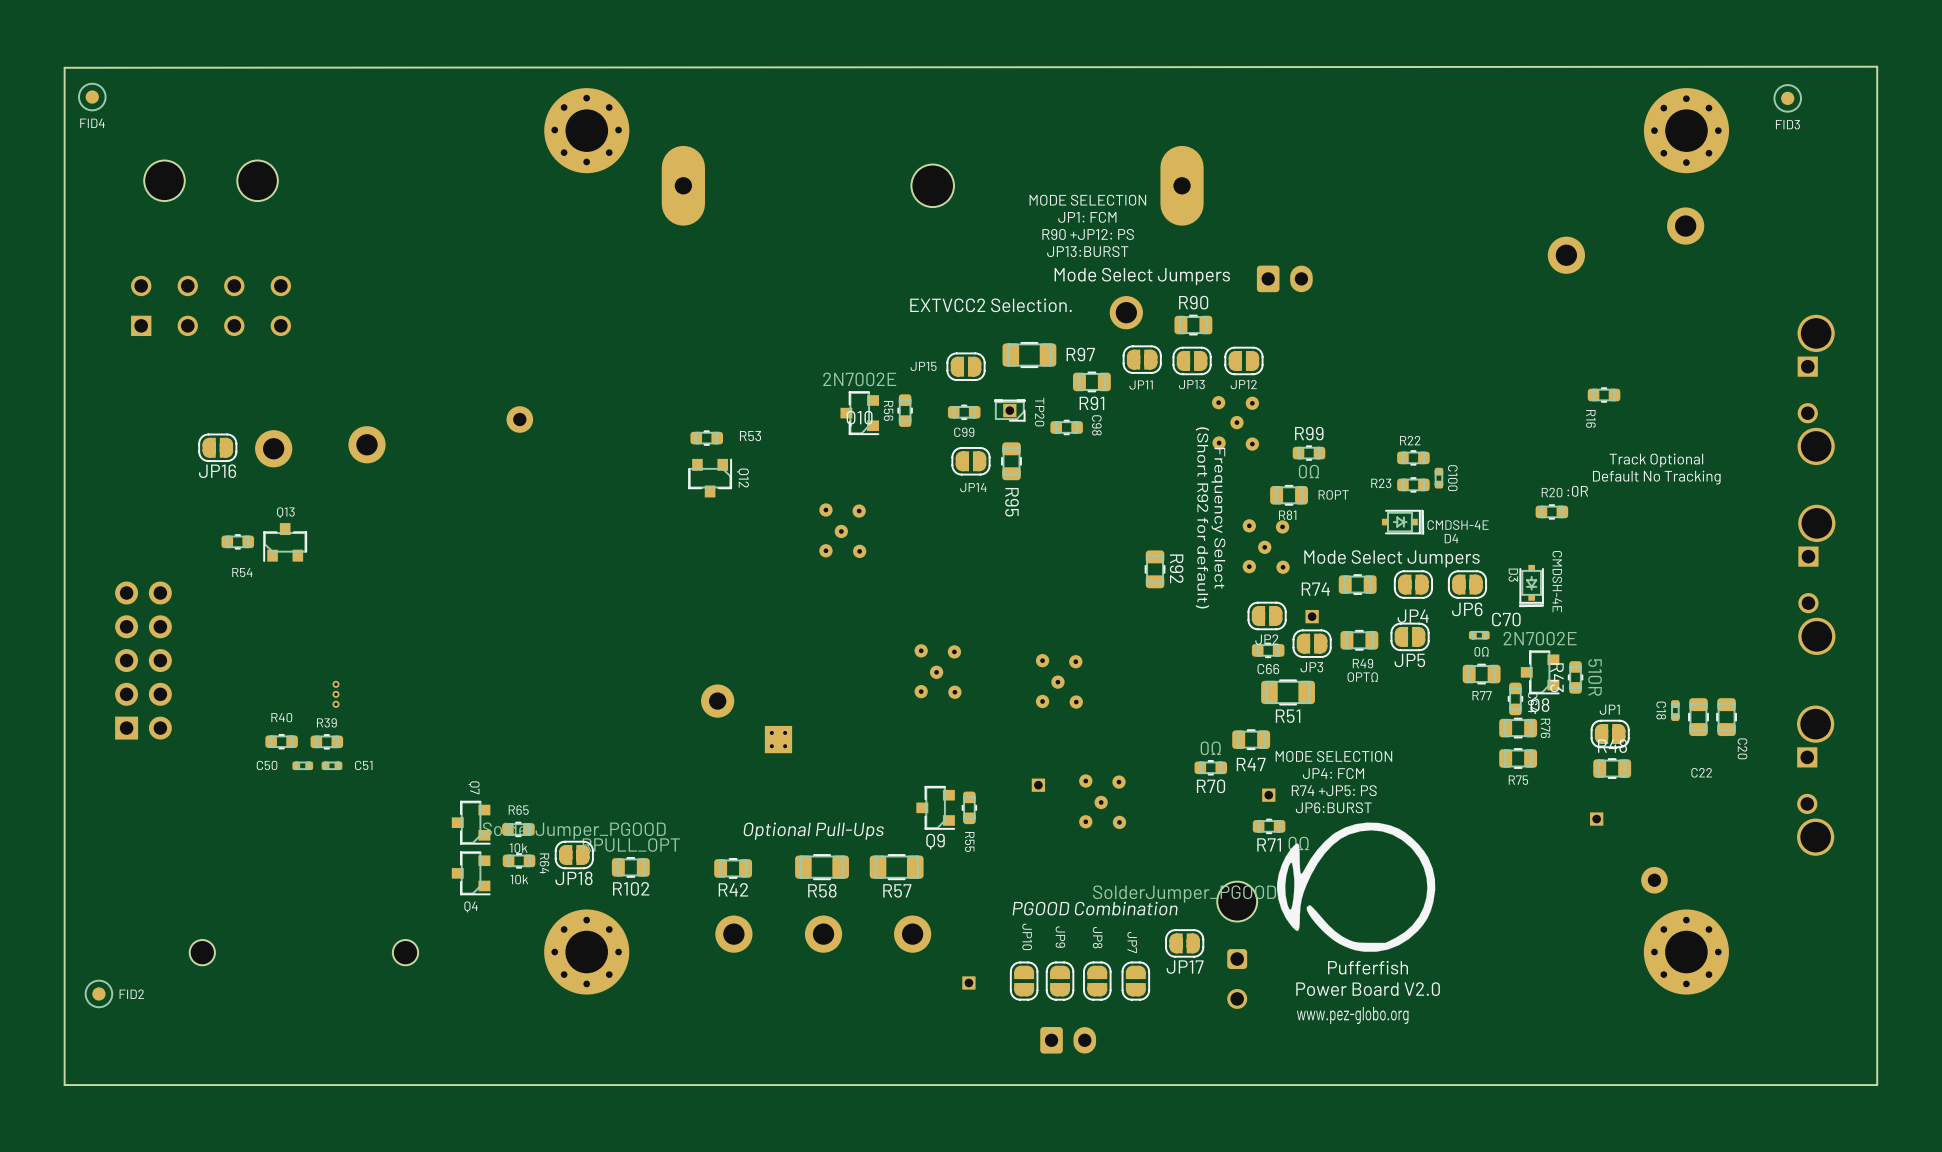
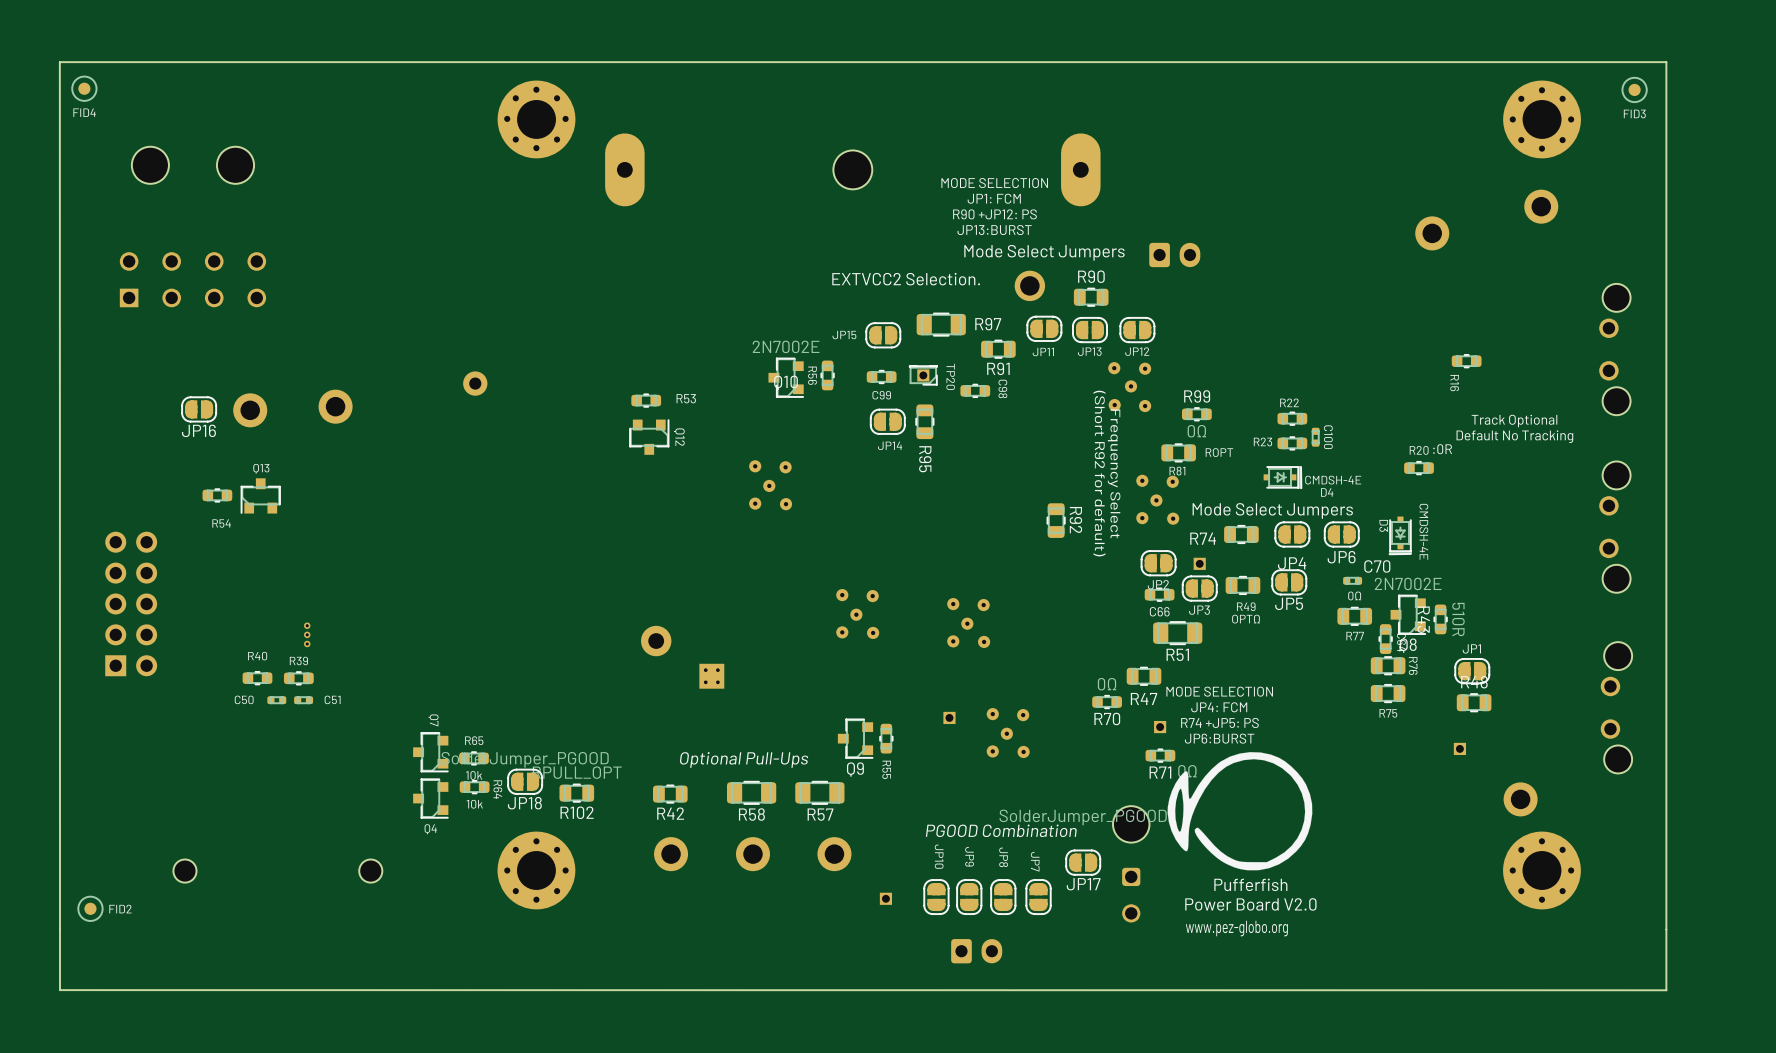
board edge: (1877, 66) (64, 67) (64, 1085) (1877, 1085) (1877, 66) -> (1666, 62) (1666, 990) (60, 990) (59, 62) (1666, 62)
part: none -> (1614, 349)
part: (1816, 389) -> none
part: none -> (1614, 527)
part: (1816, 579) -> none
C18: (1675, 710) -> none
C22: (1698, 717) -> none
C20: (1726, 717) -> none
part: none -> (1616, 707)
part: (1815, 780) -> none
part footprint: [1641, 866, 1668, 894] -> [1503, 782, 1538, 817]

